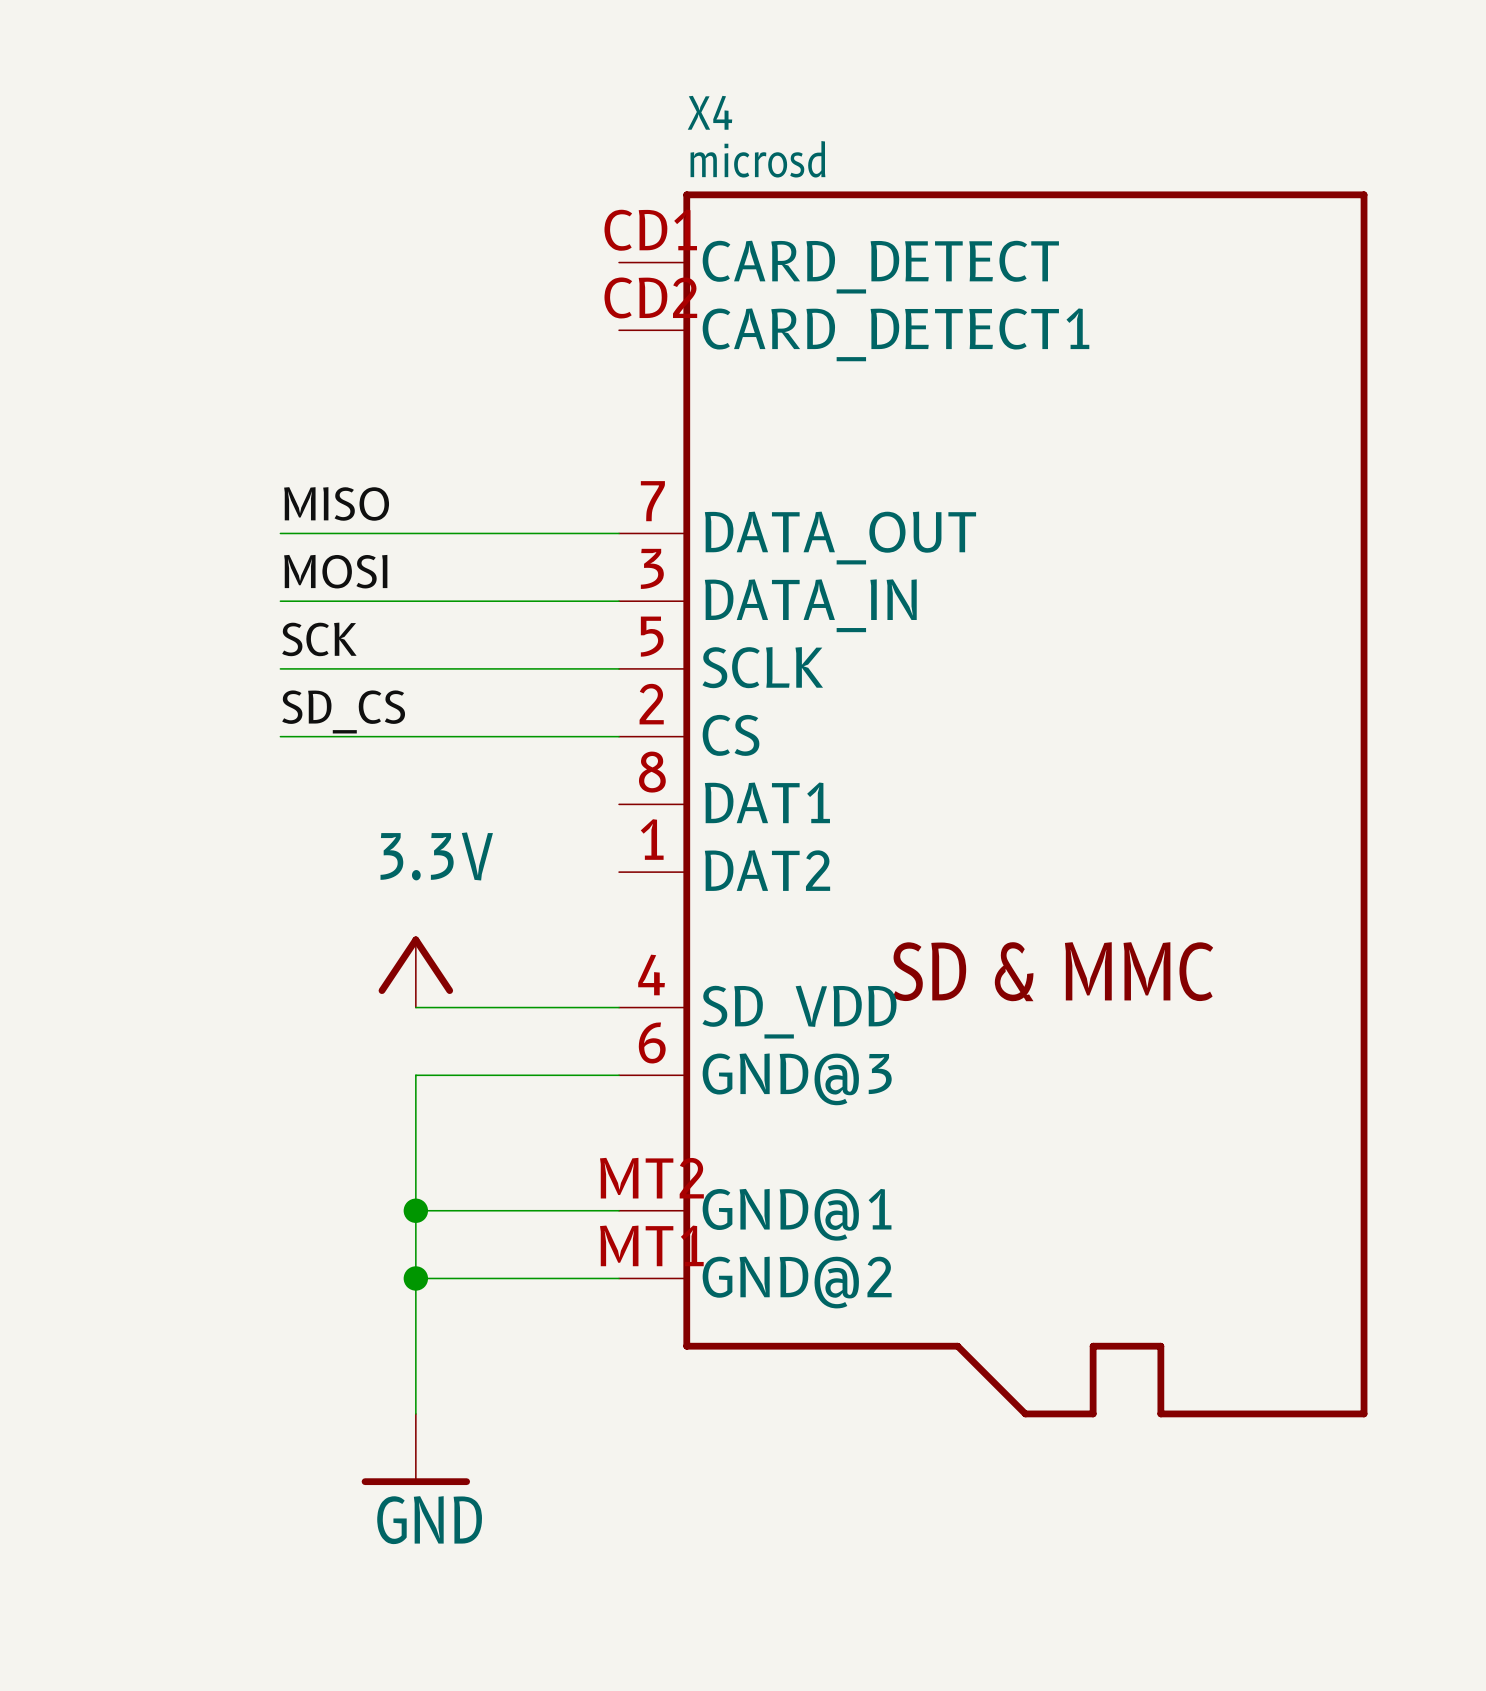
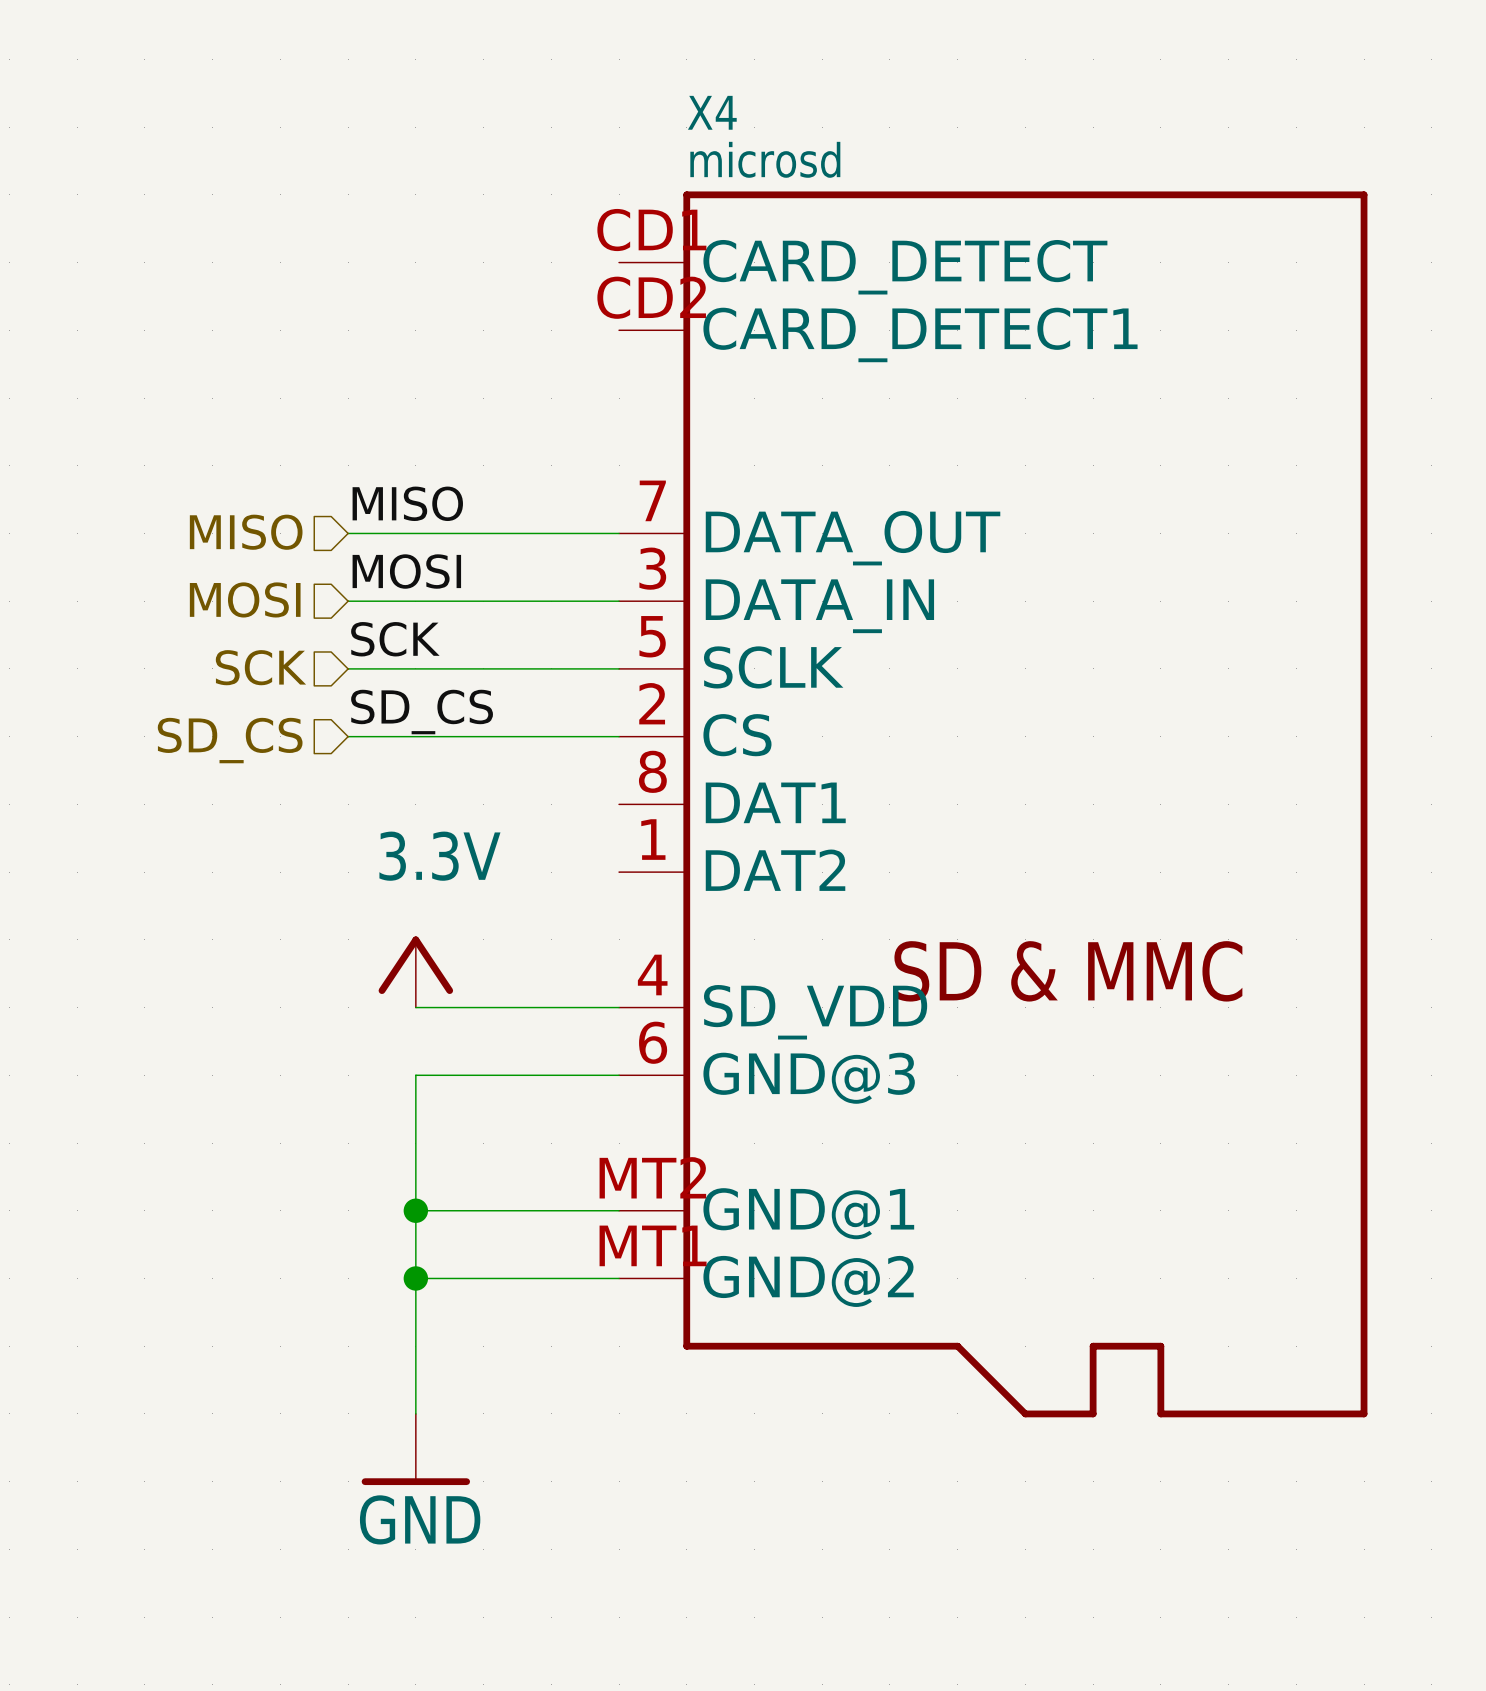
label position: MISO (336, 503) -> MISO (407, 503)
hierarchical label: none -> MISO (246, 532)
wire: (280, 533) (348, 533) -> none
label position: MOSI (335, 571) -> MOSI (406, 571)
hierarchical label: none -> MOSI (245, 599)
wire: (280, 601) (348, 601) -> none
label position: SCK (319, 639) -> SCK (395, 639)
hierarchical label: none -> SCK (260, 667)
wire: (280, 668) (348, 668) -> none
label position: SD_CS (343, 711) -> SD_CS (422, 712)
wire: (280, 736) (348, 736) -> none
hierarchical label: none -> SD_CS (230, 740)

